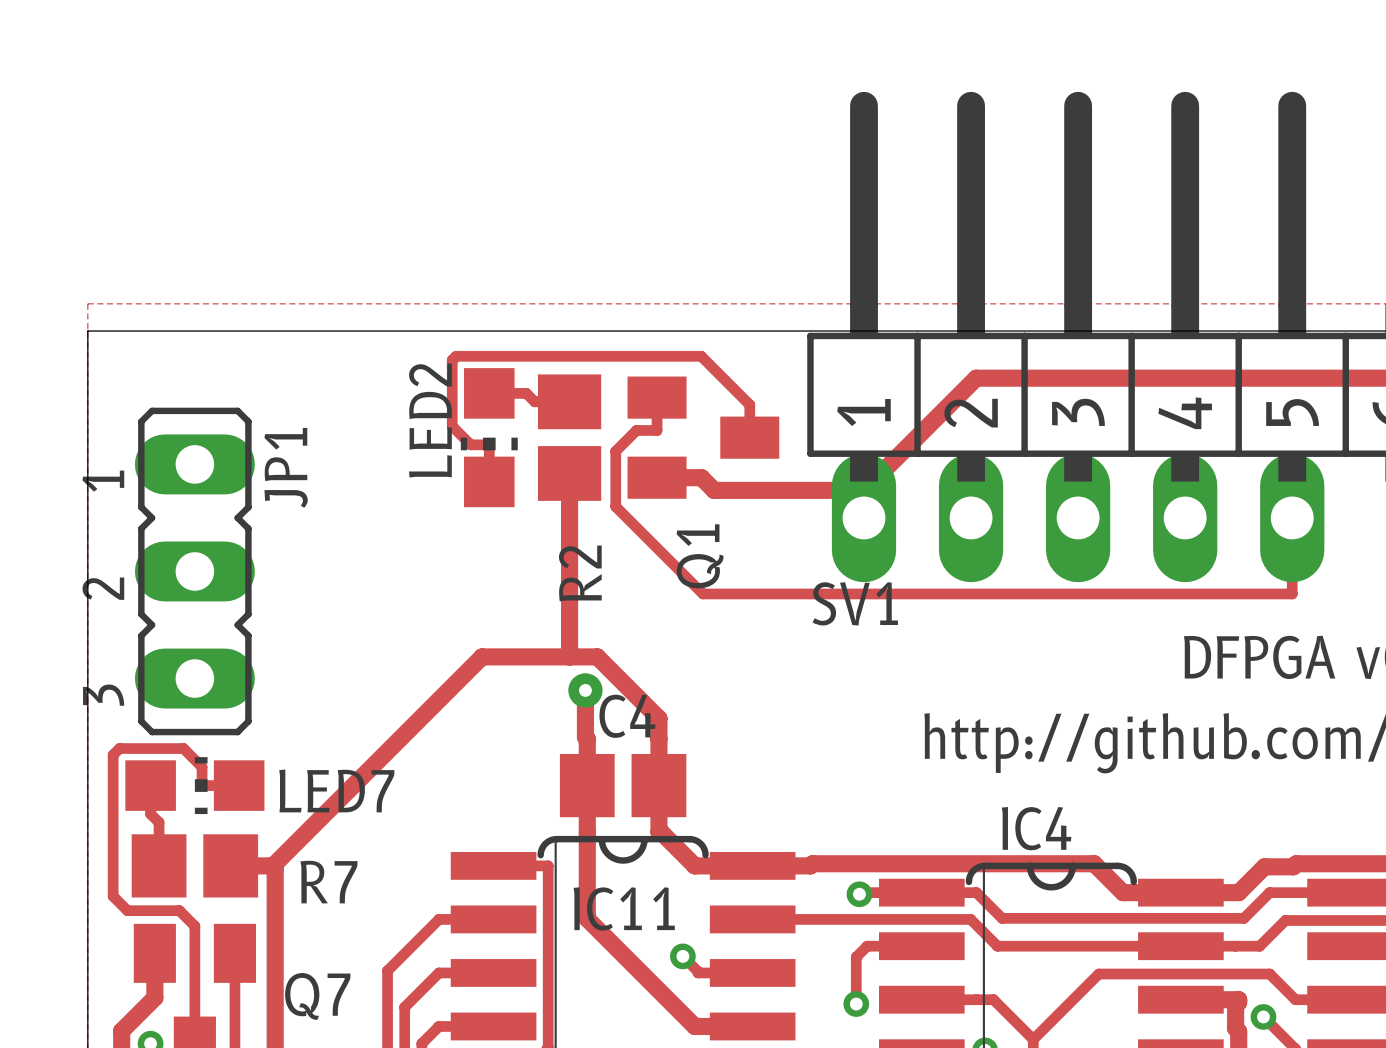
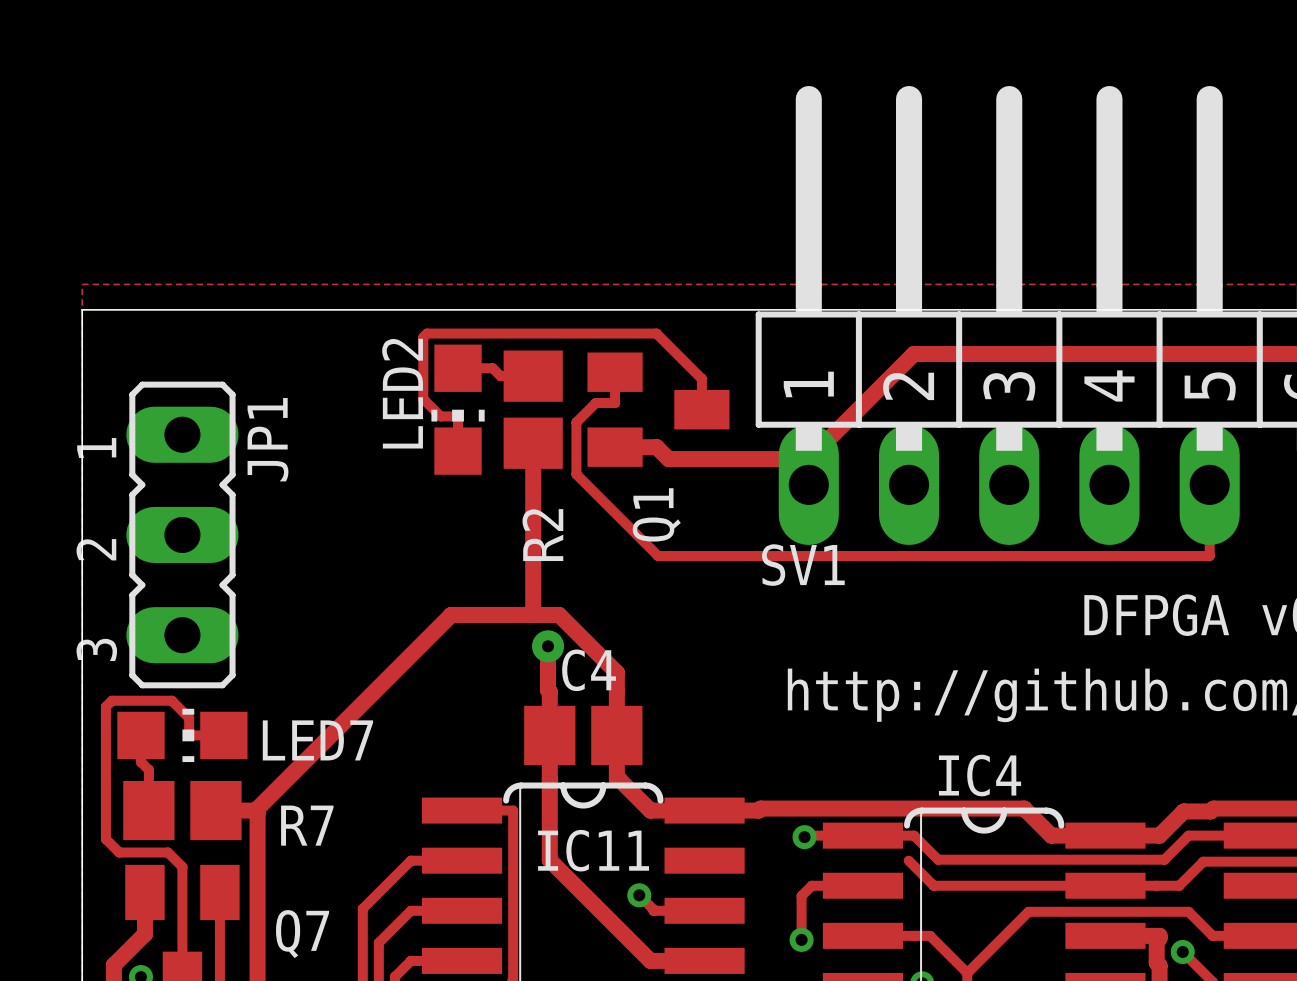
track: (752, 919) (970, 919) -> none

